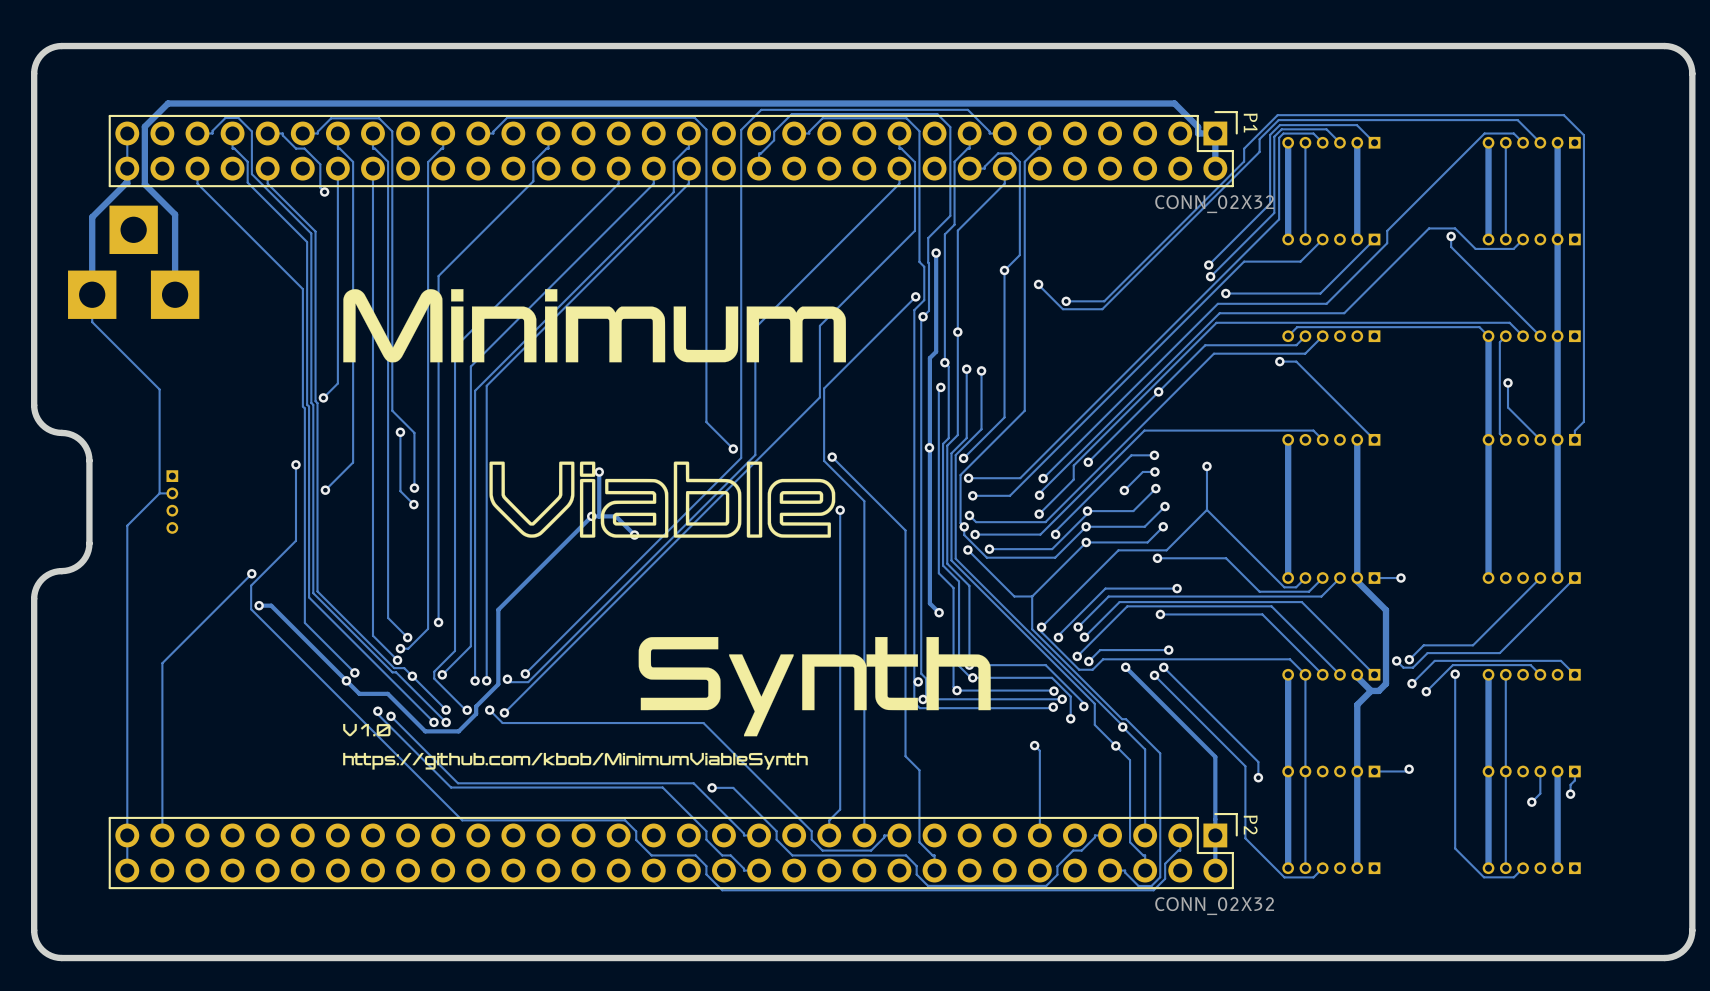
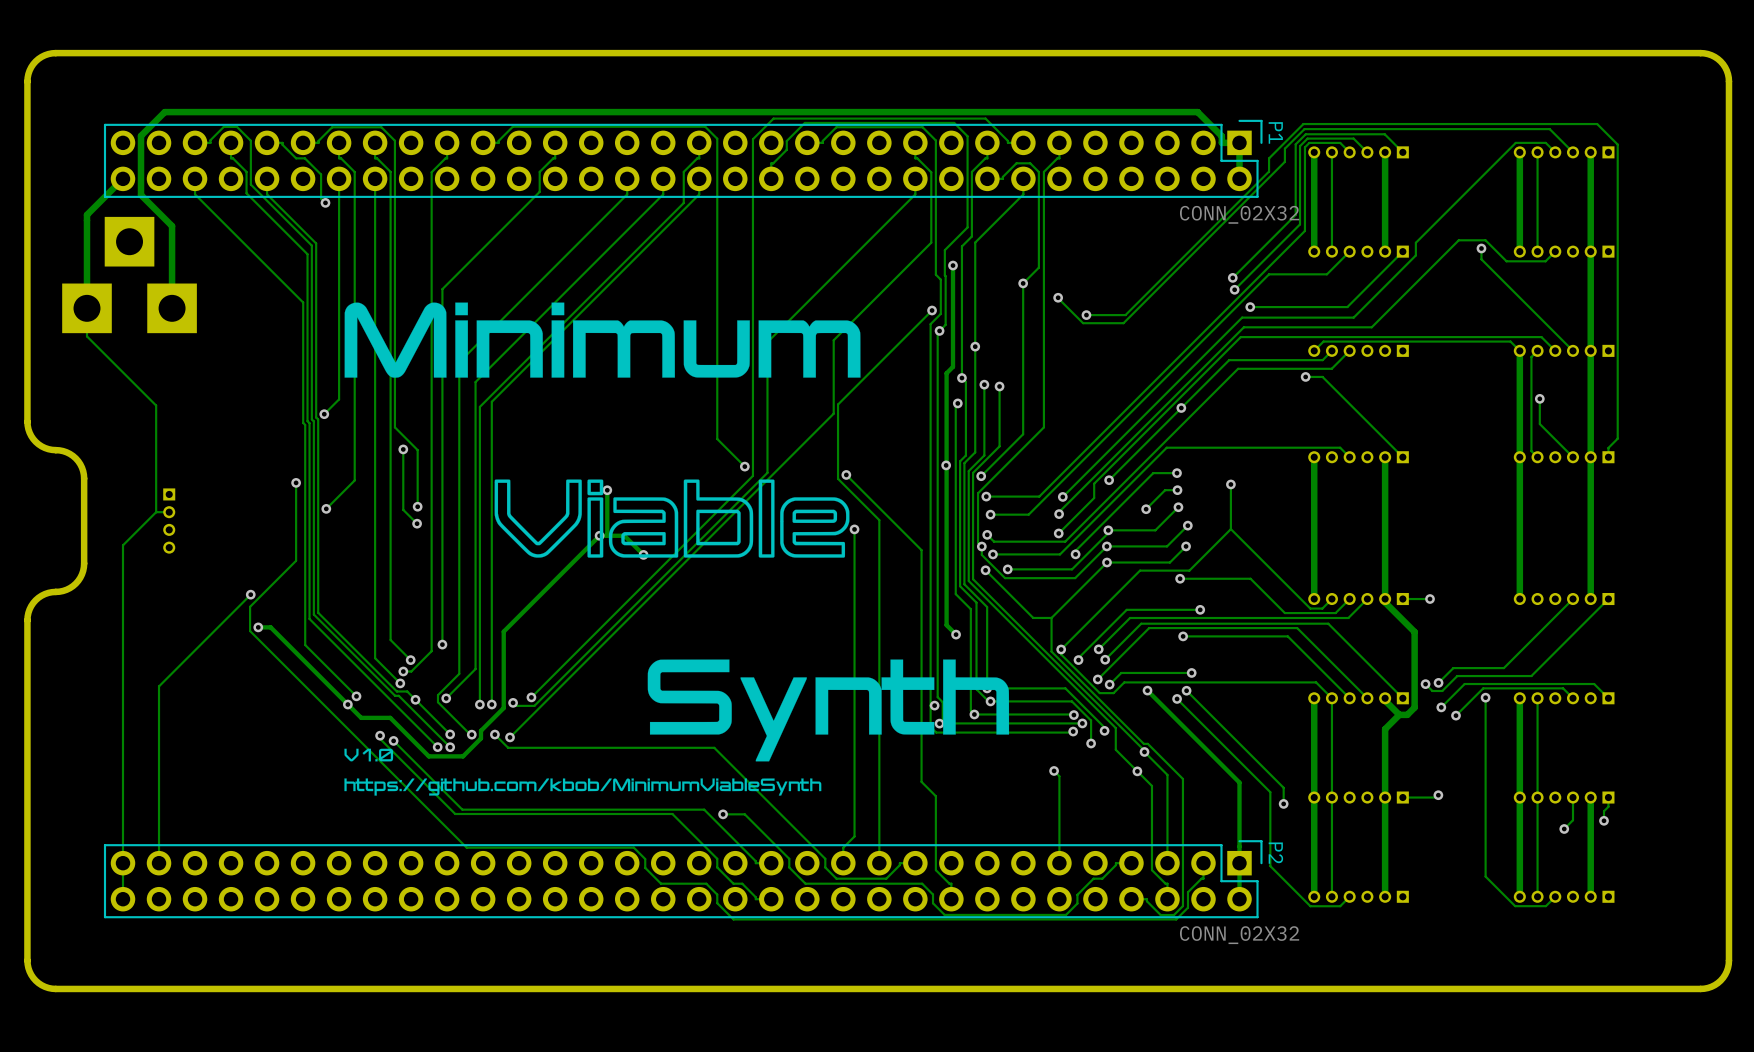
track: (127, 133) (127, 183) (92, 217) -> (123, 178) (86, 214) (86, 228)

